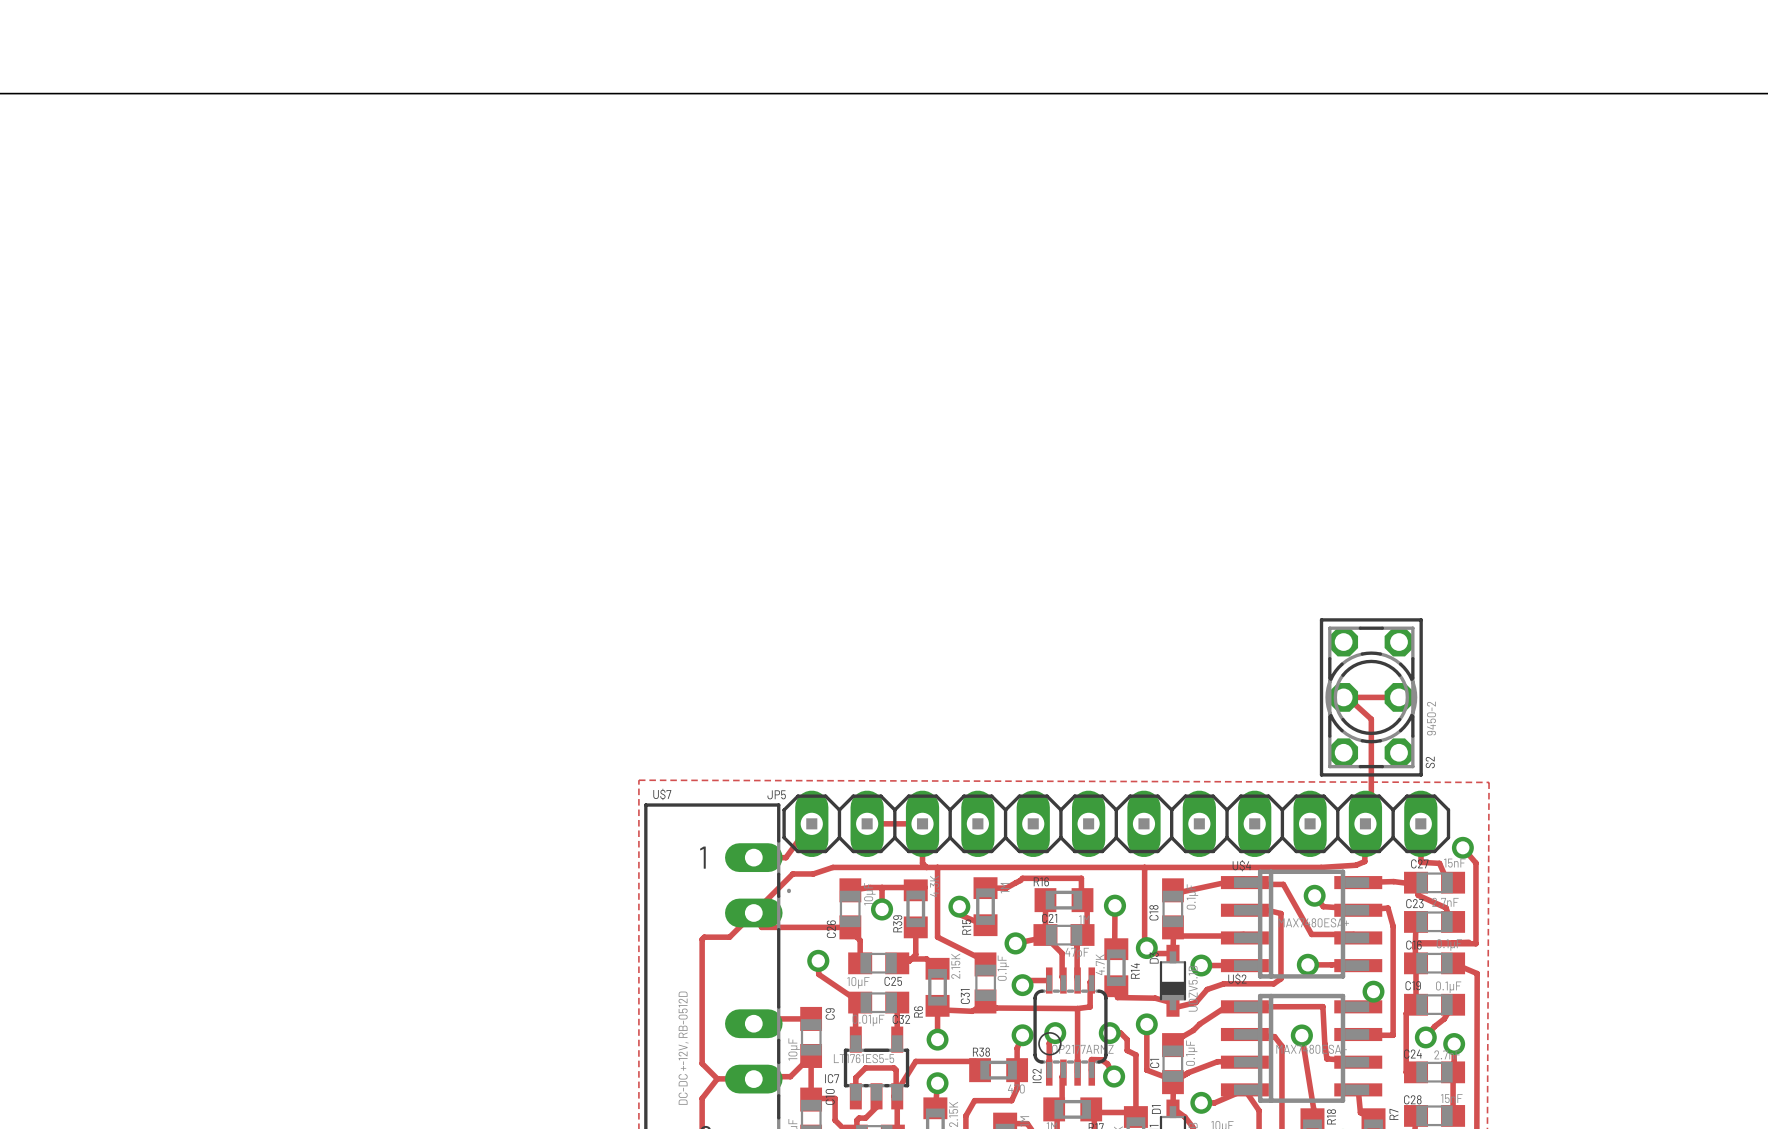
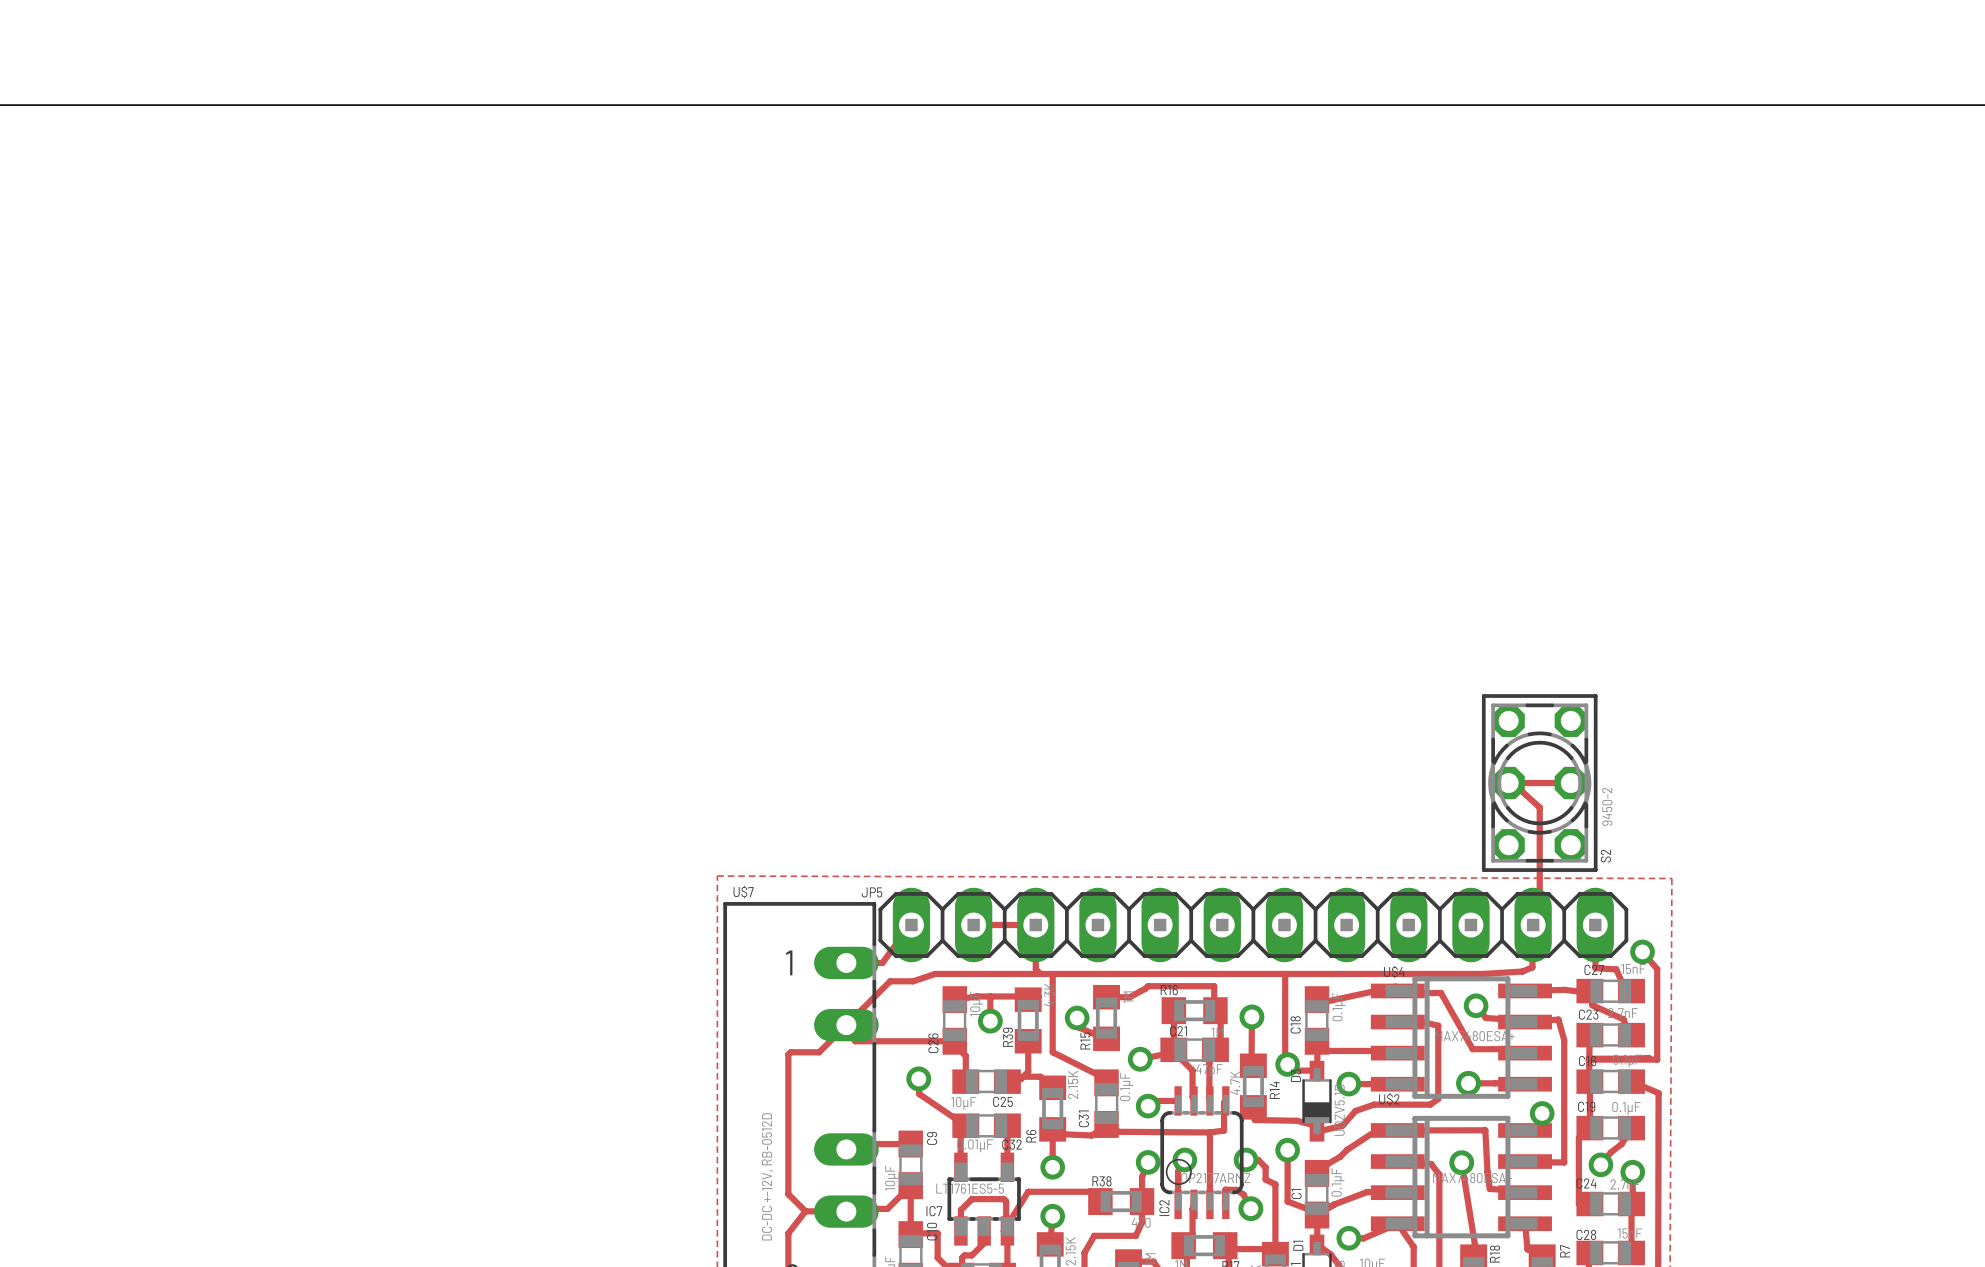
JP5 value: . (788, 890) -> none

